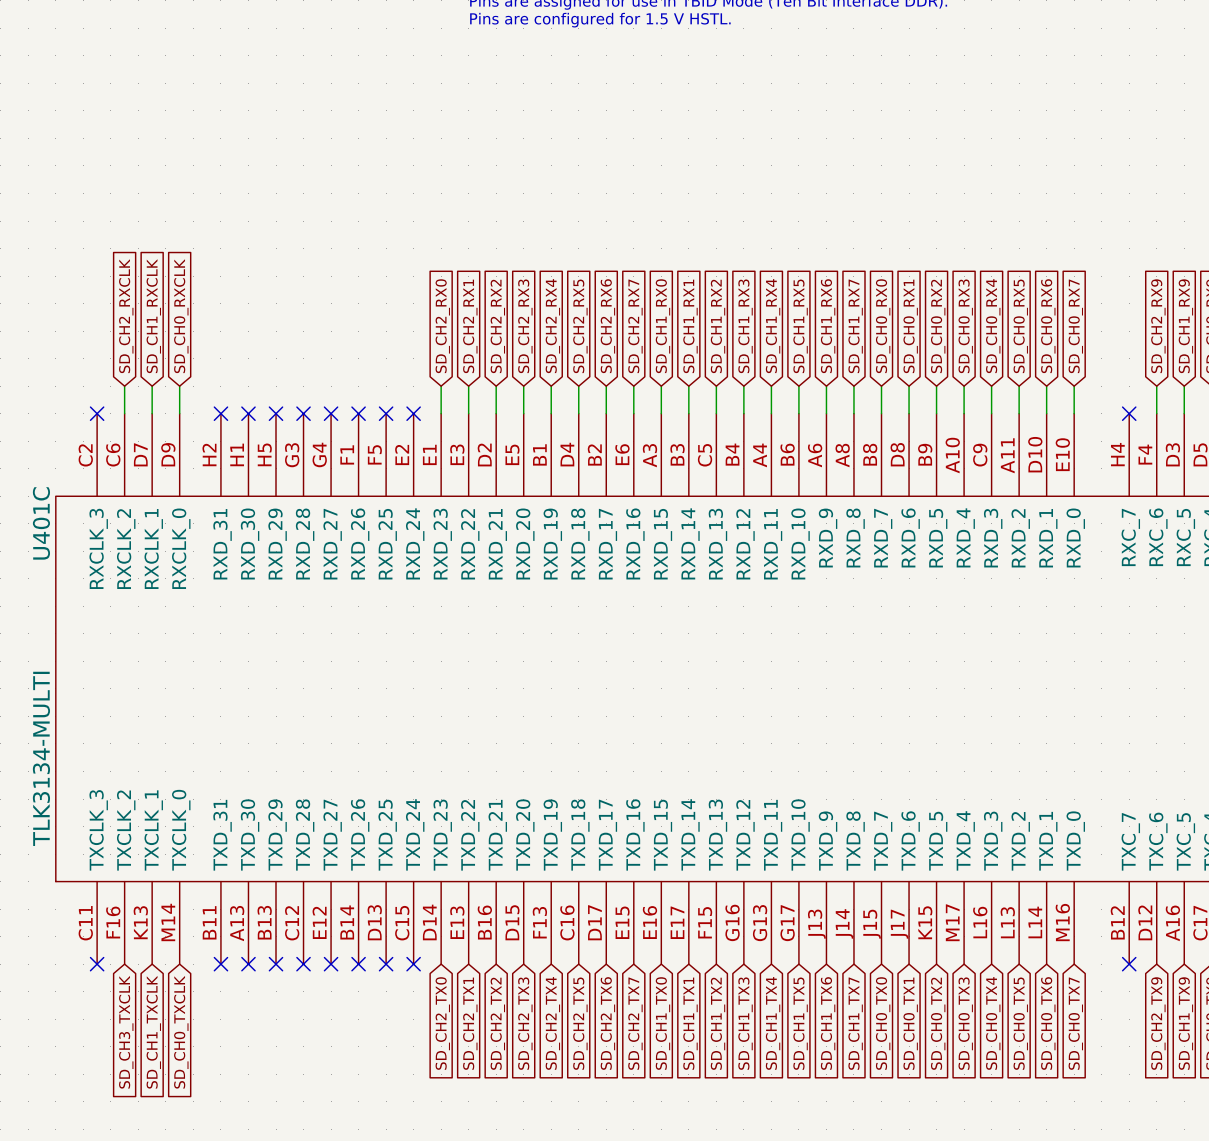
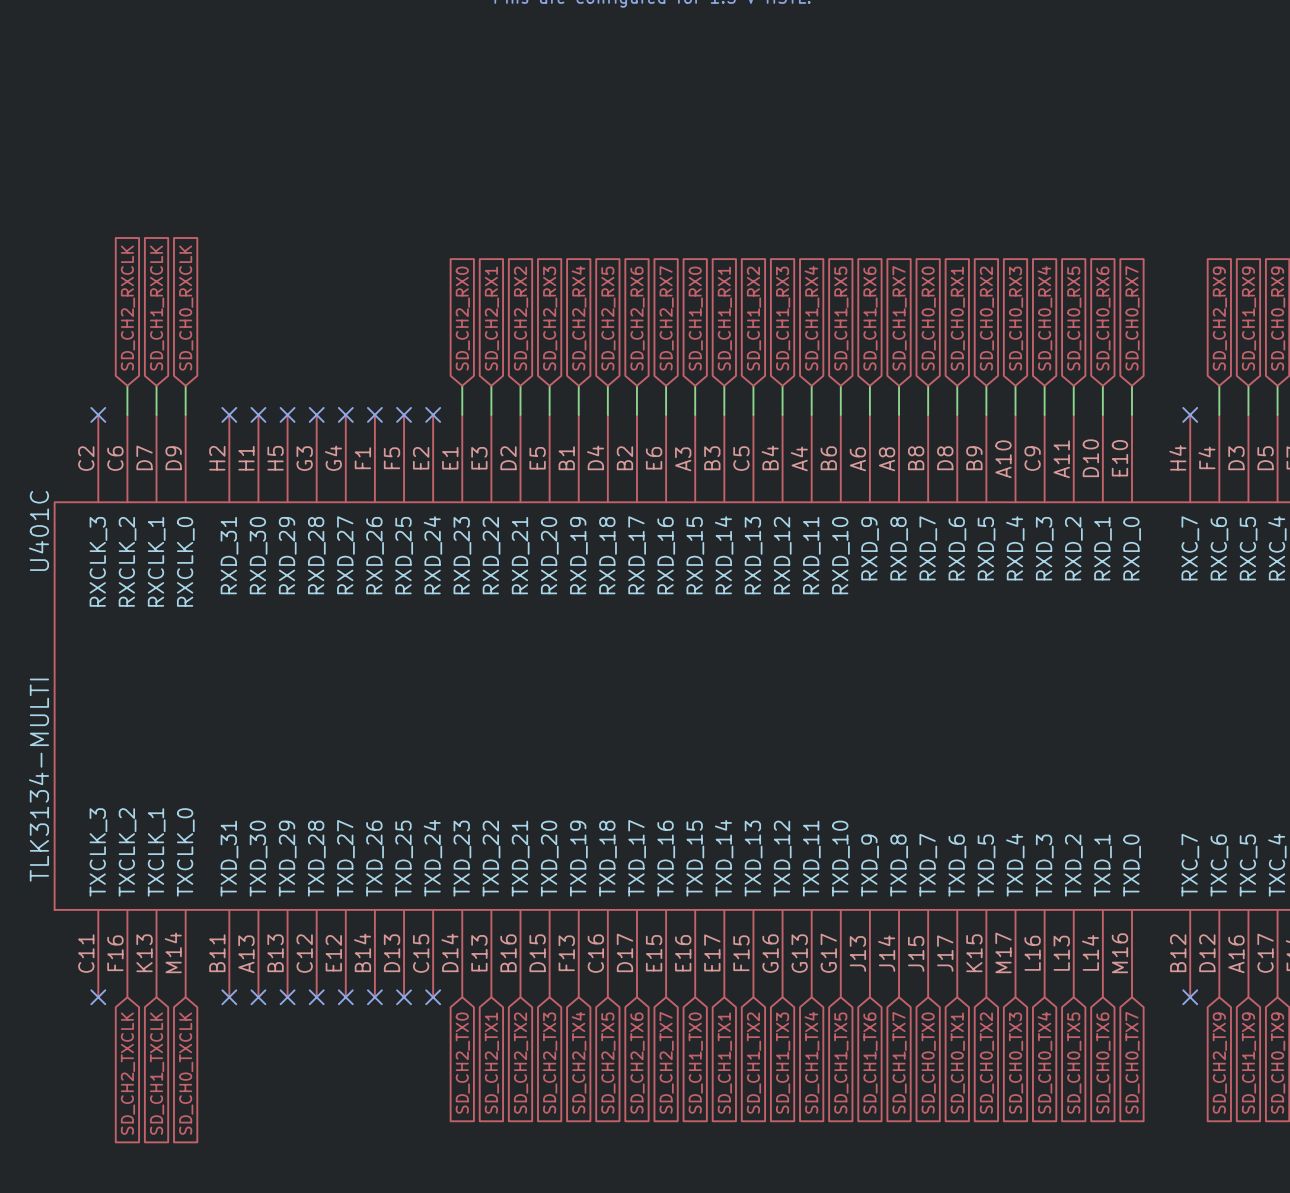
global label: SD_CH3_TXCLK (126, 1032) -> SD_CH2_TXCLK (127, 1073)

